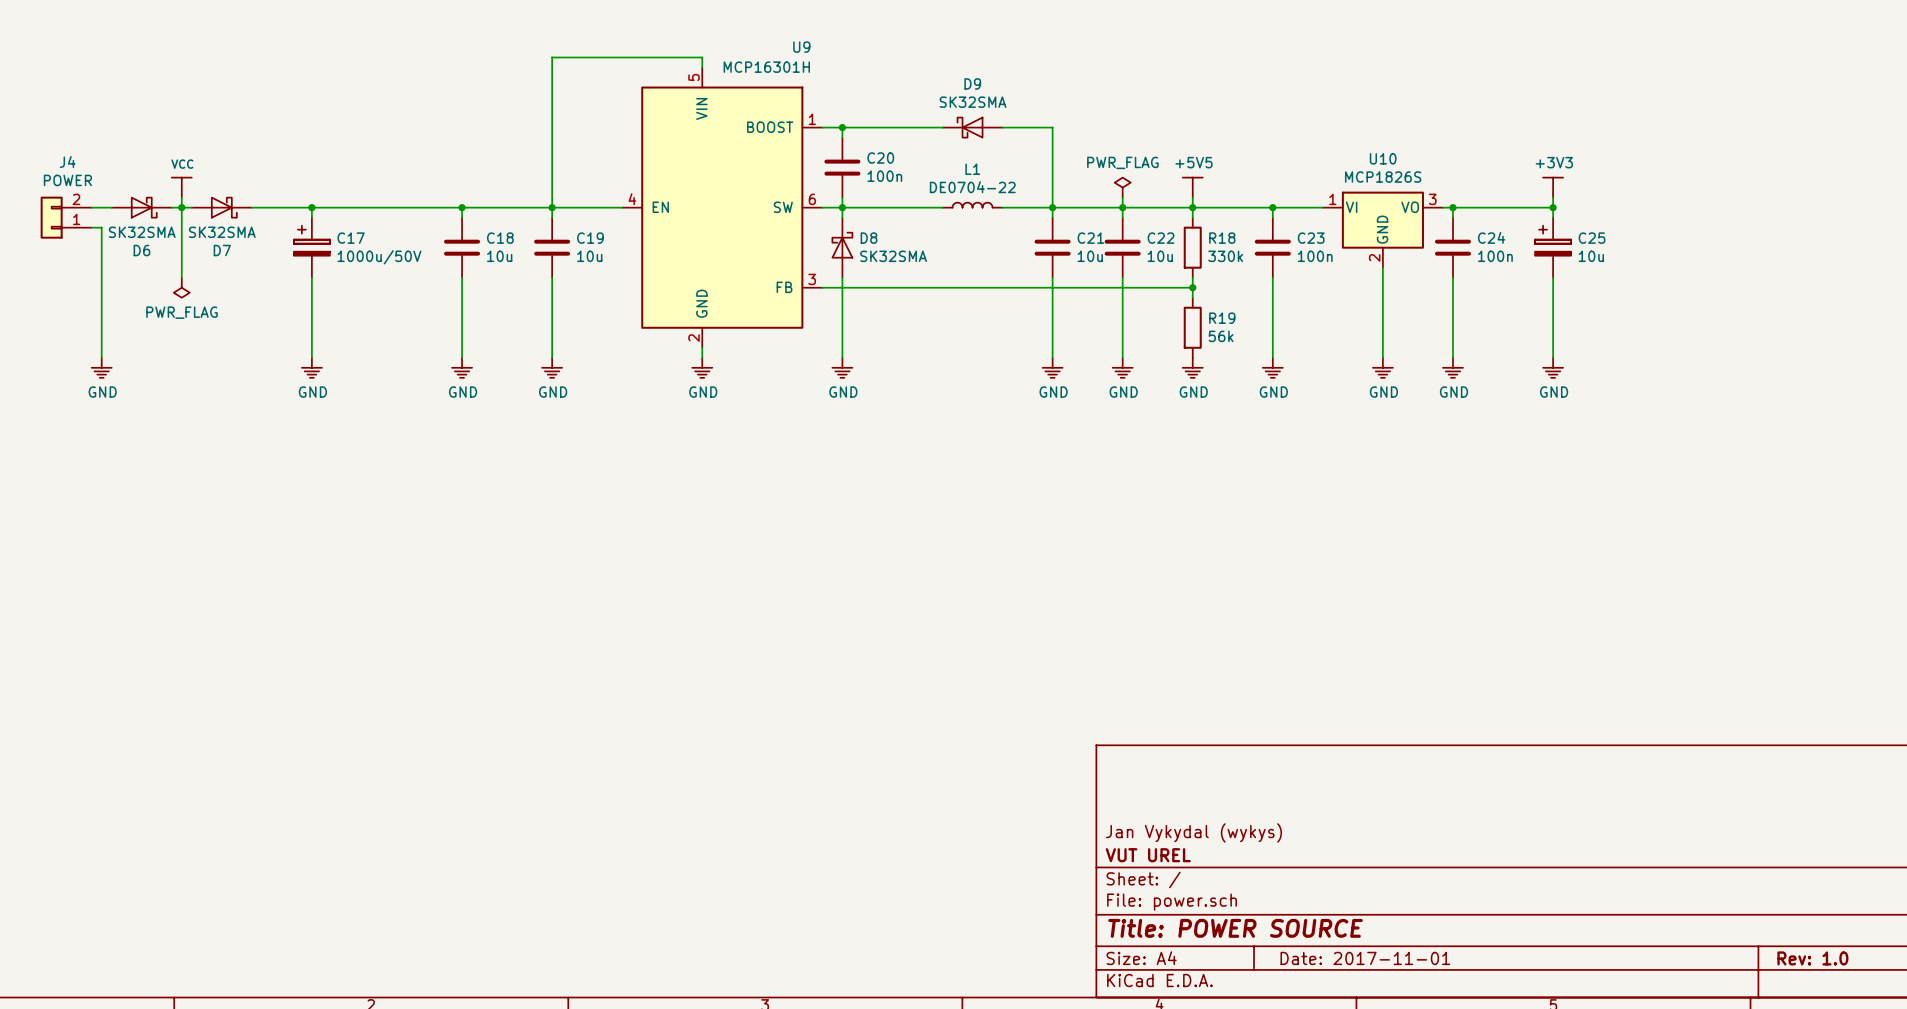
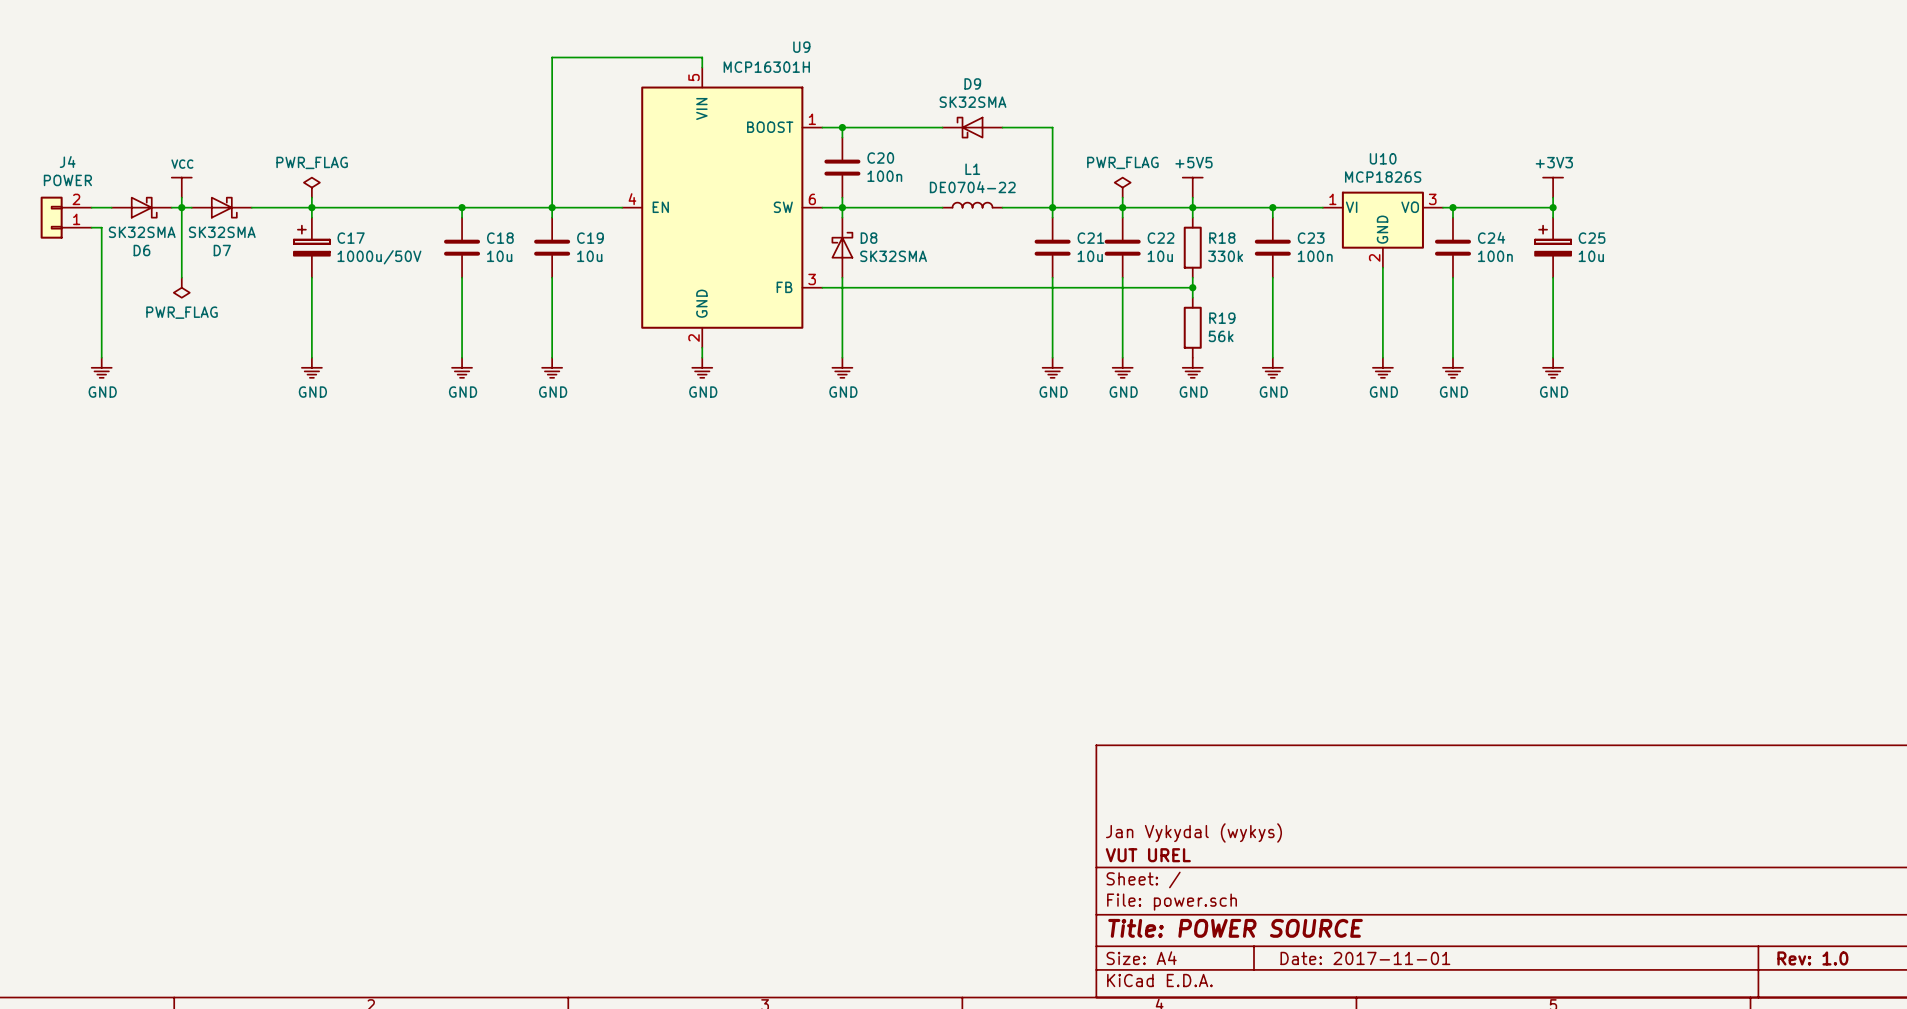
power symbol: none -> PWR_FLAG (311, 187)
wire: none -> (311, 197) (311, 207)

